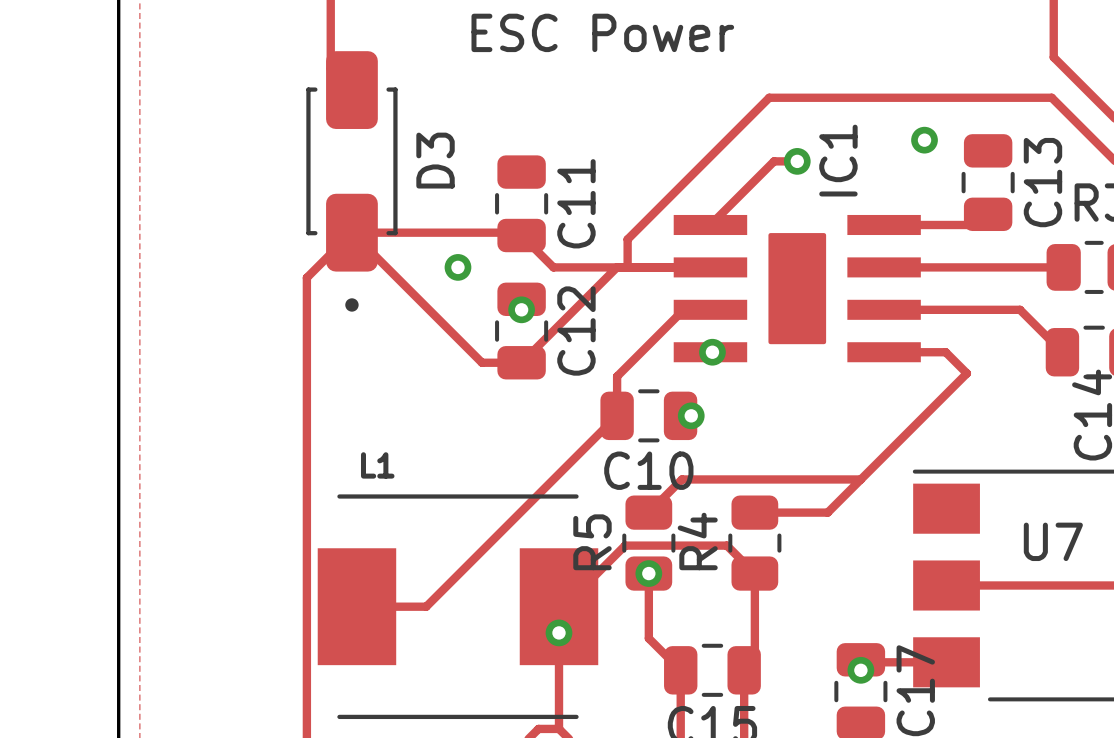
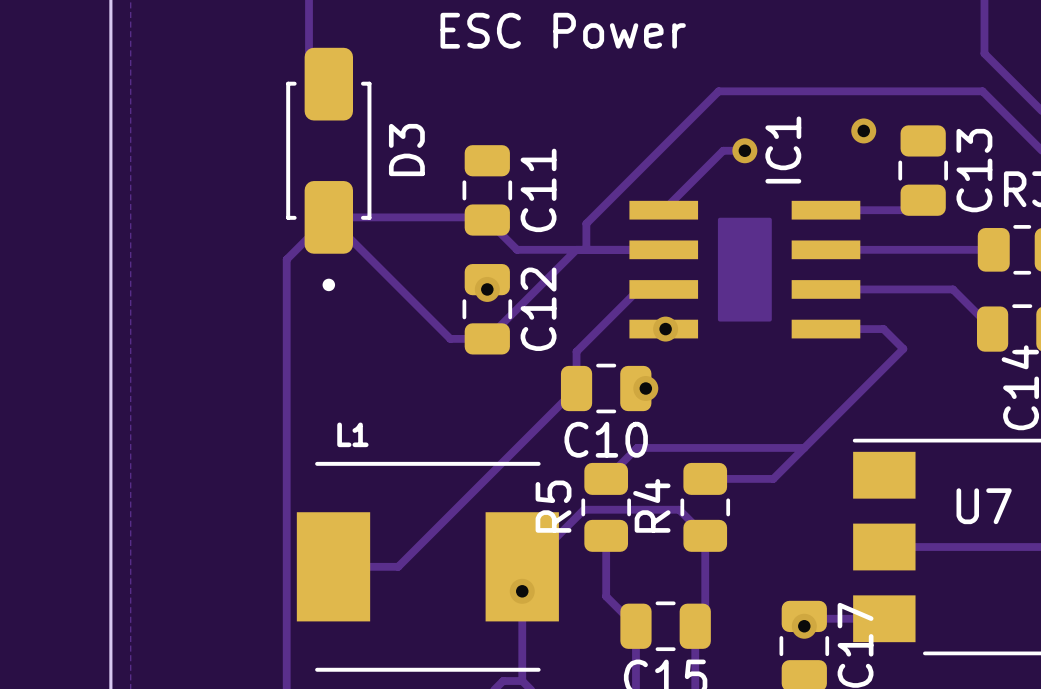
via: (457, 267) -> none
via: (648, 573) -> none

